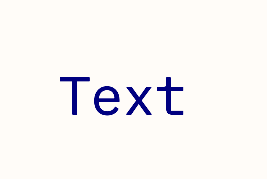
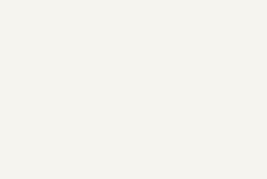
text: Text (121, 96) -> none

